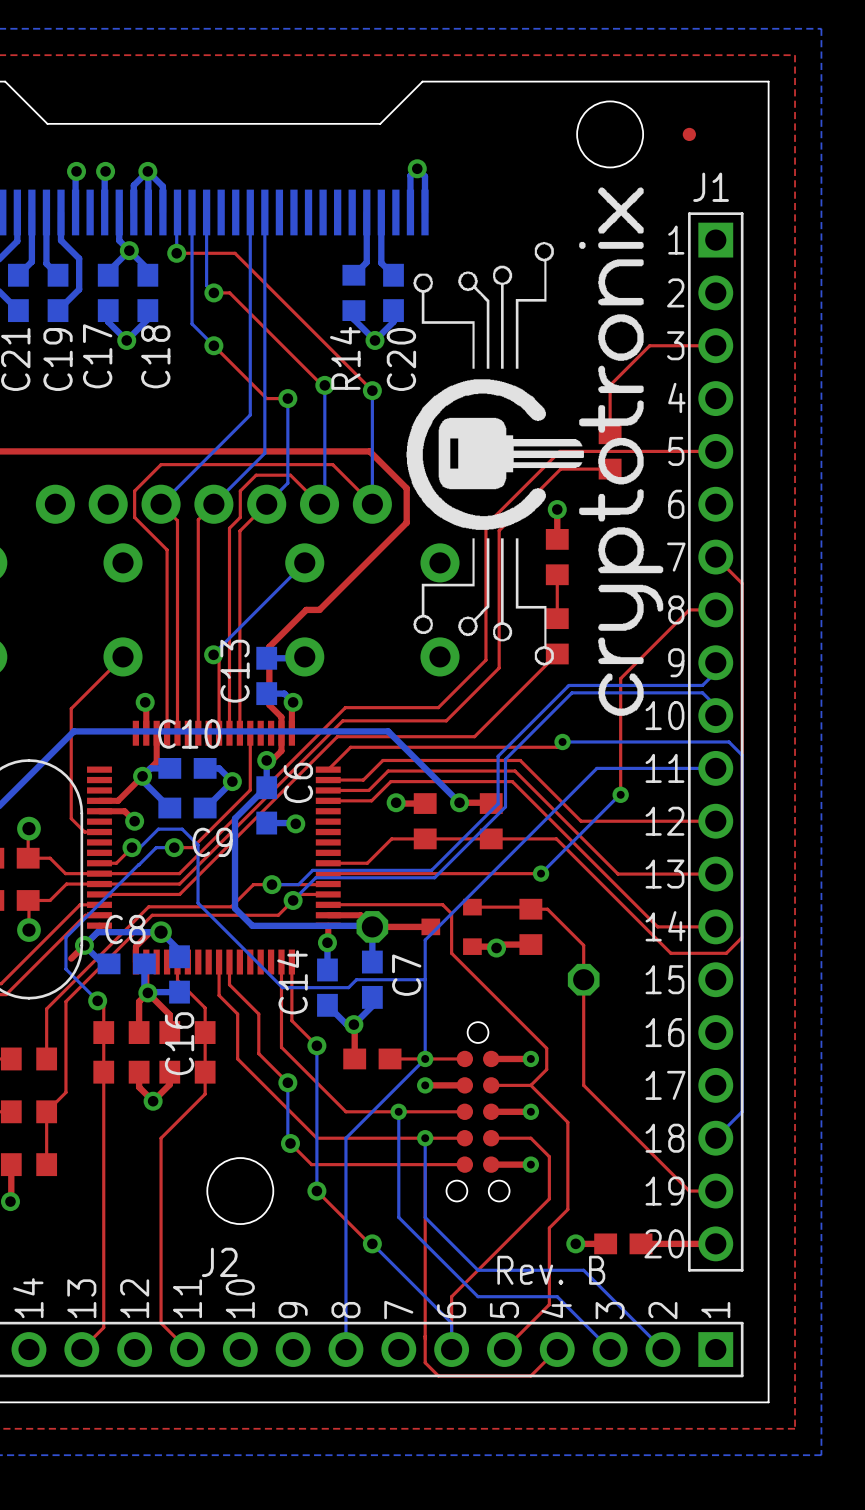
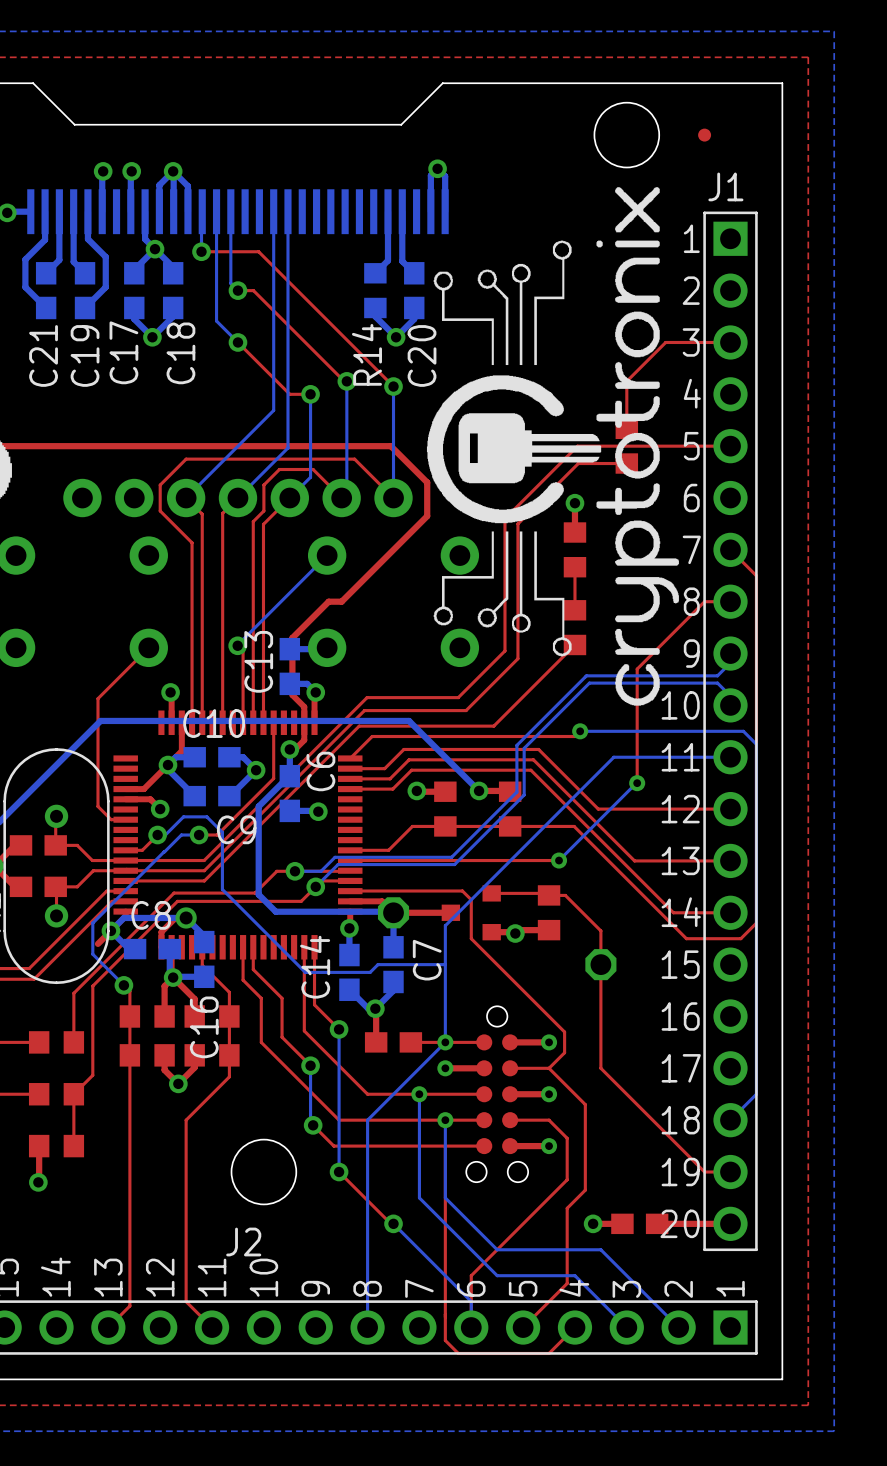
text: Rev. B (551, 1270) -> none

